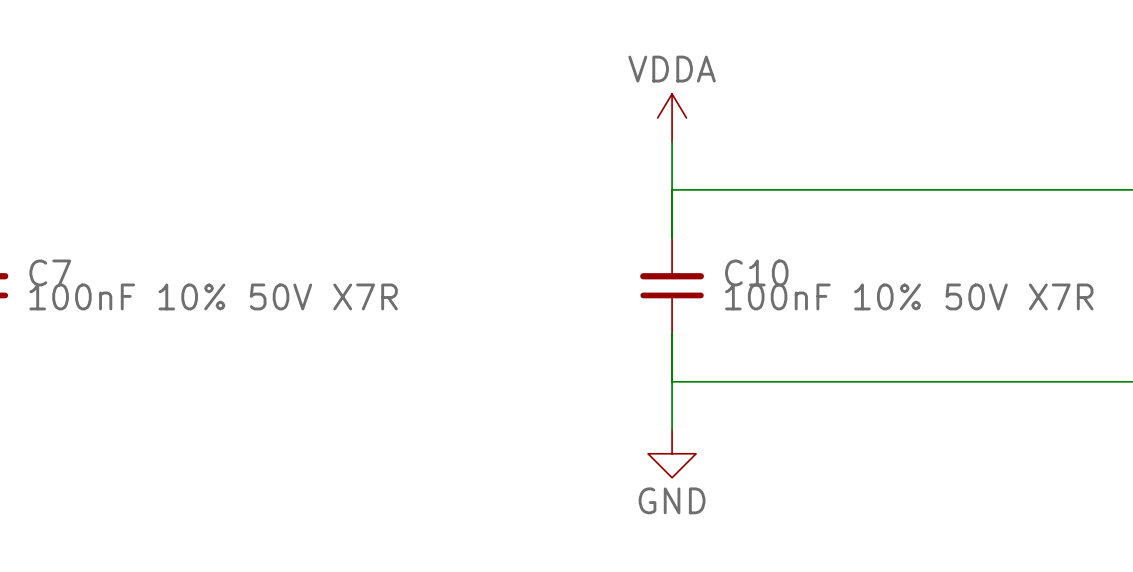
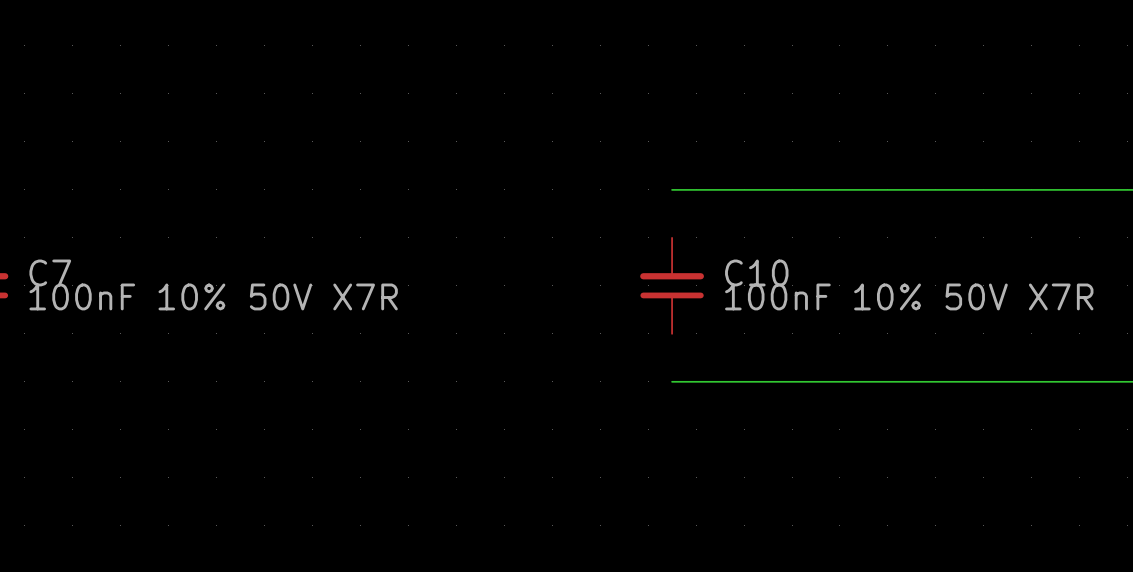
power symbol: VDDA (672, 117) -> none
wire: (672, 141) (672, 237) -> none
wire: (672, 333) (672, 429) -> none
power symbol: GND (672, 453) -> none

